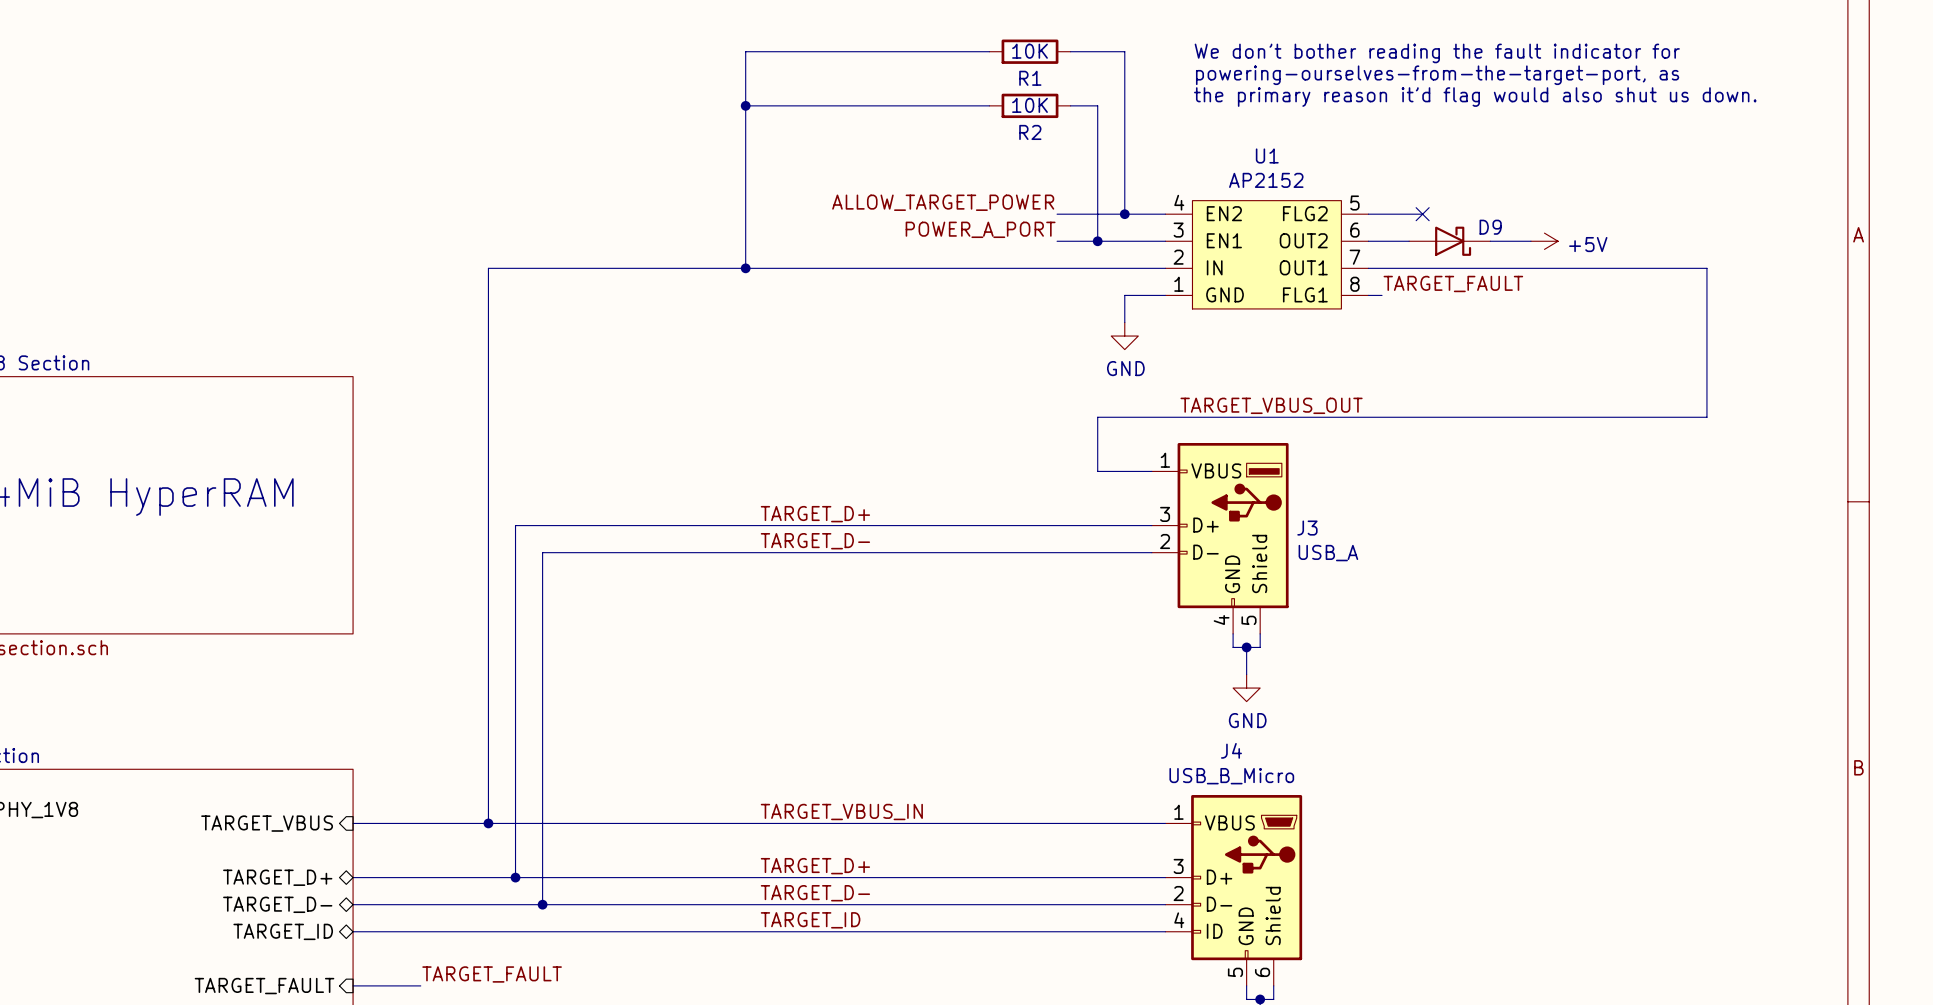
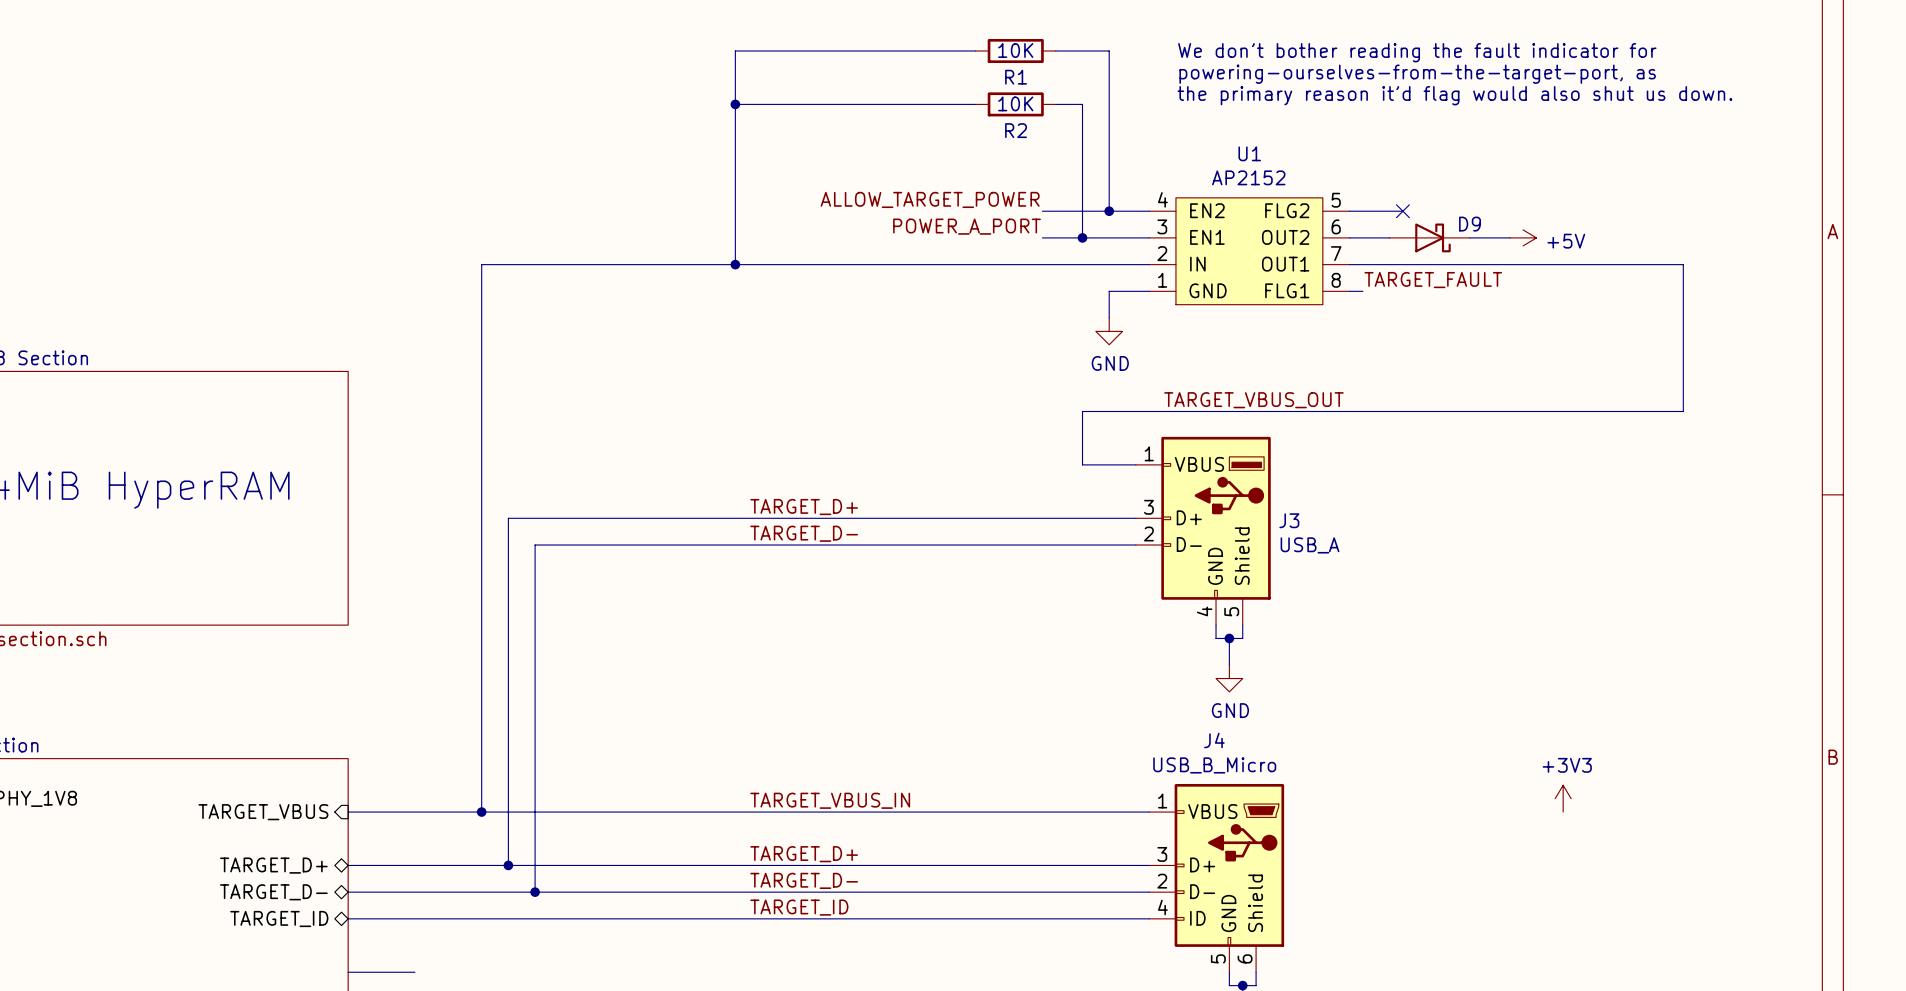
power symbol: none -> +3V3 (1563, 798)
label: TARGET_FAULT (492, 974) -> none
sheet pin: TARGET_FAULT (264, 986) -> none

